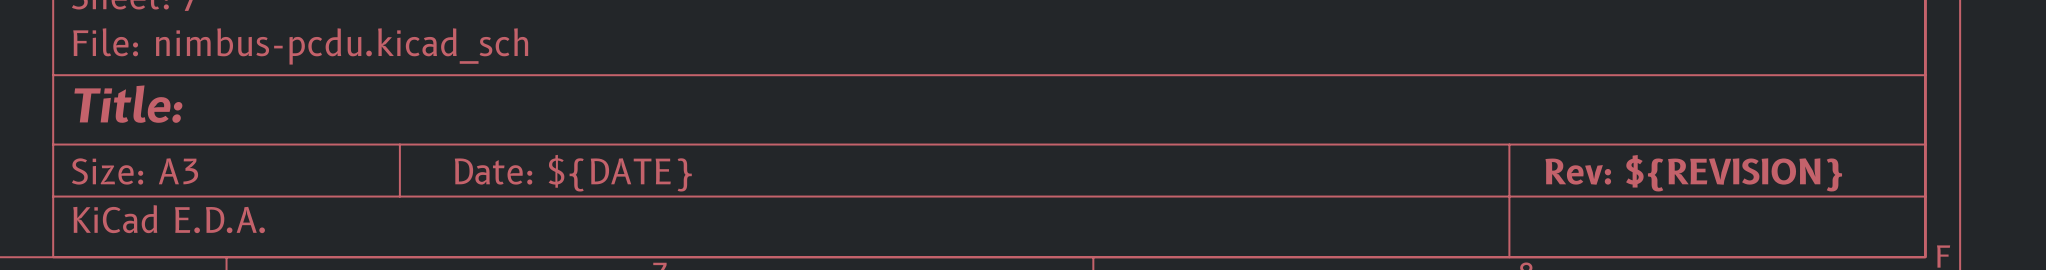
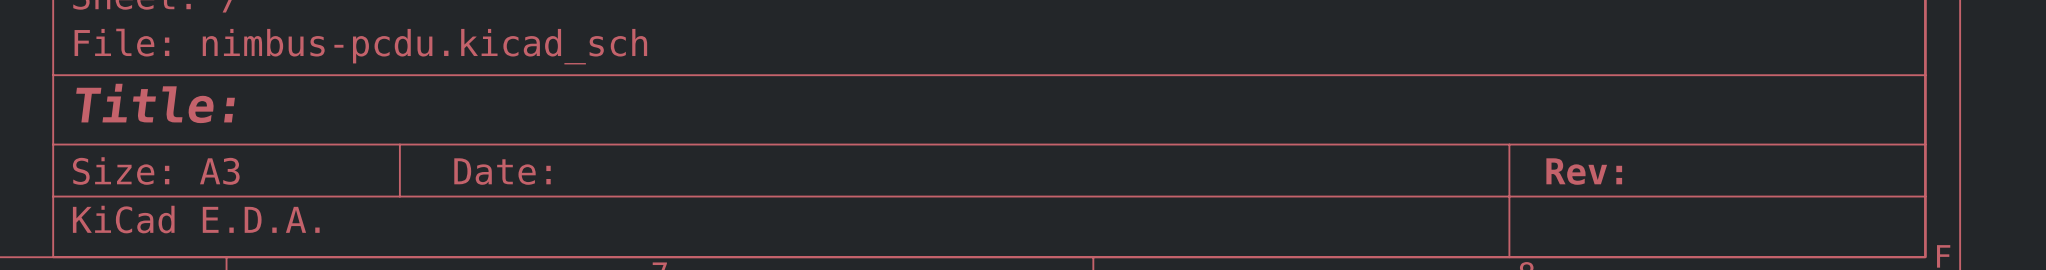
title block: Date: ${DATE} (573, 173) -> Date: (502, 171)
title block: Rev: ${REVISION} (1693, 173) -> Rev: (1584, 171)

